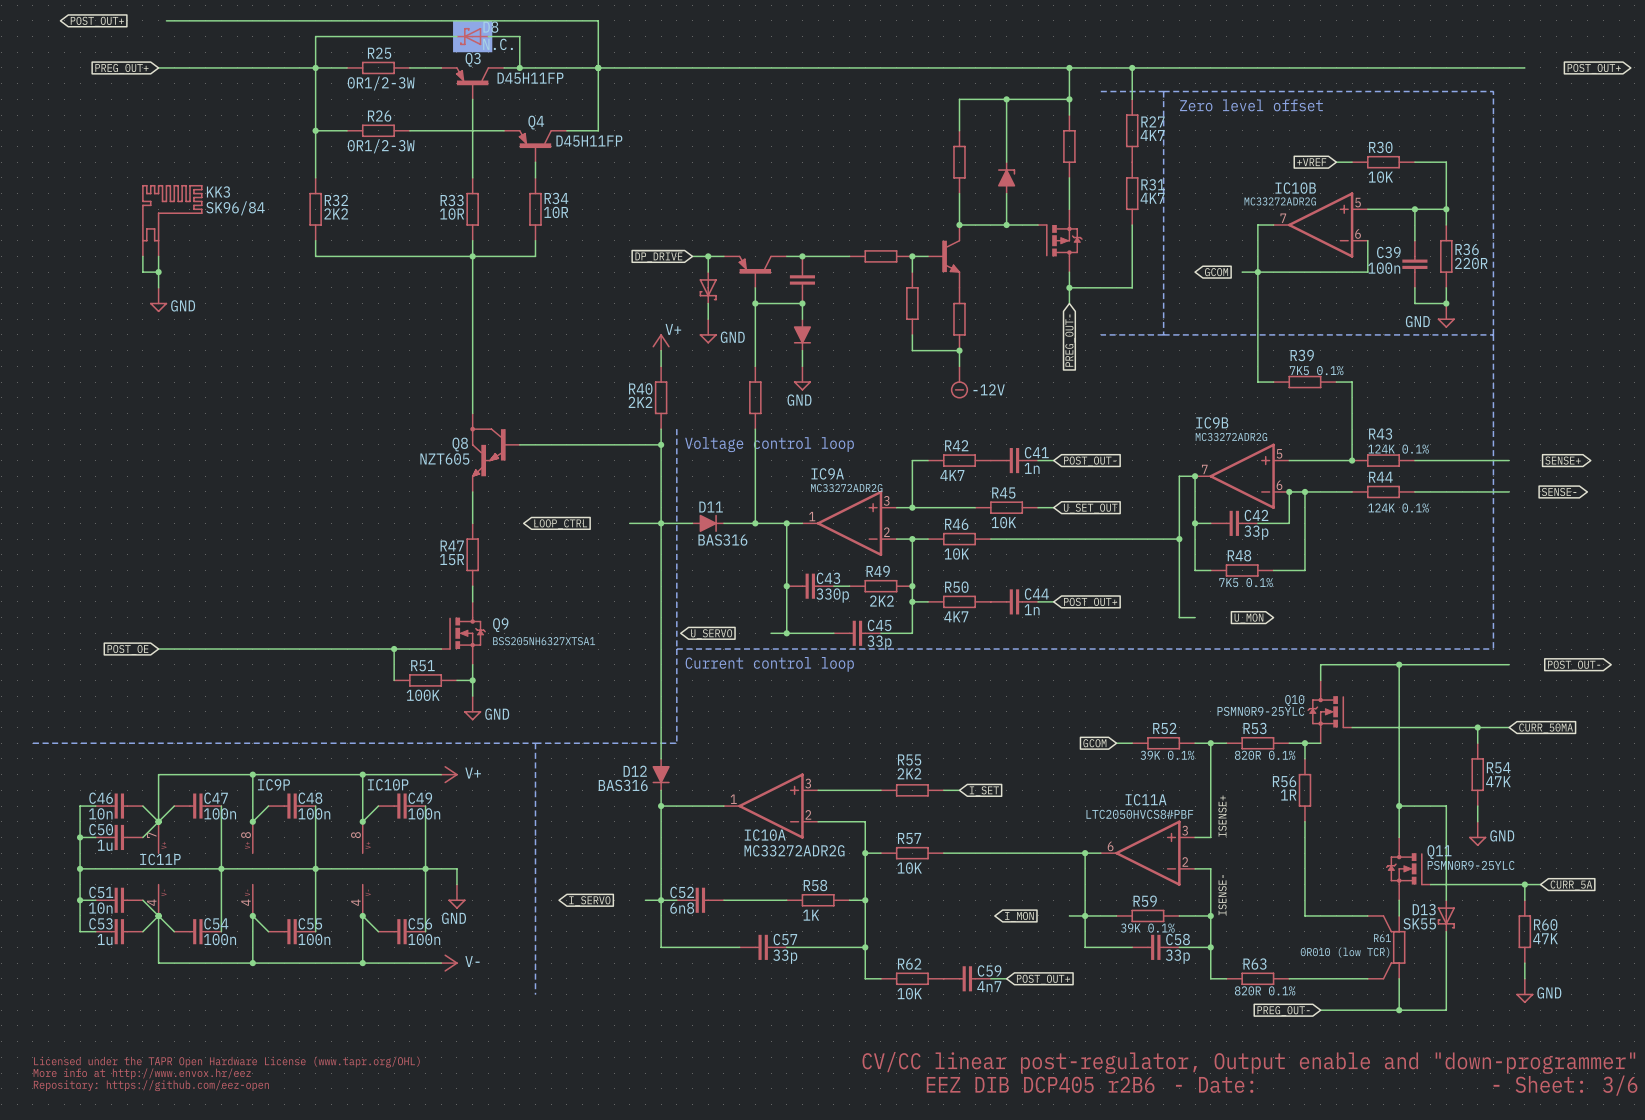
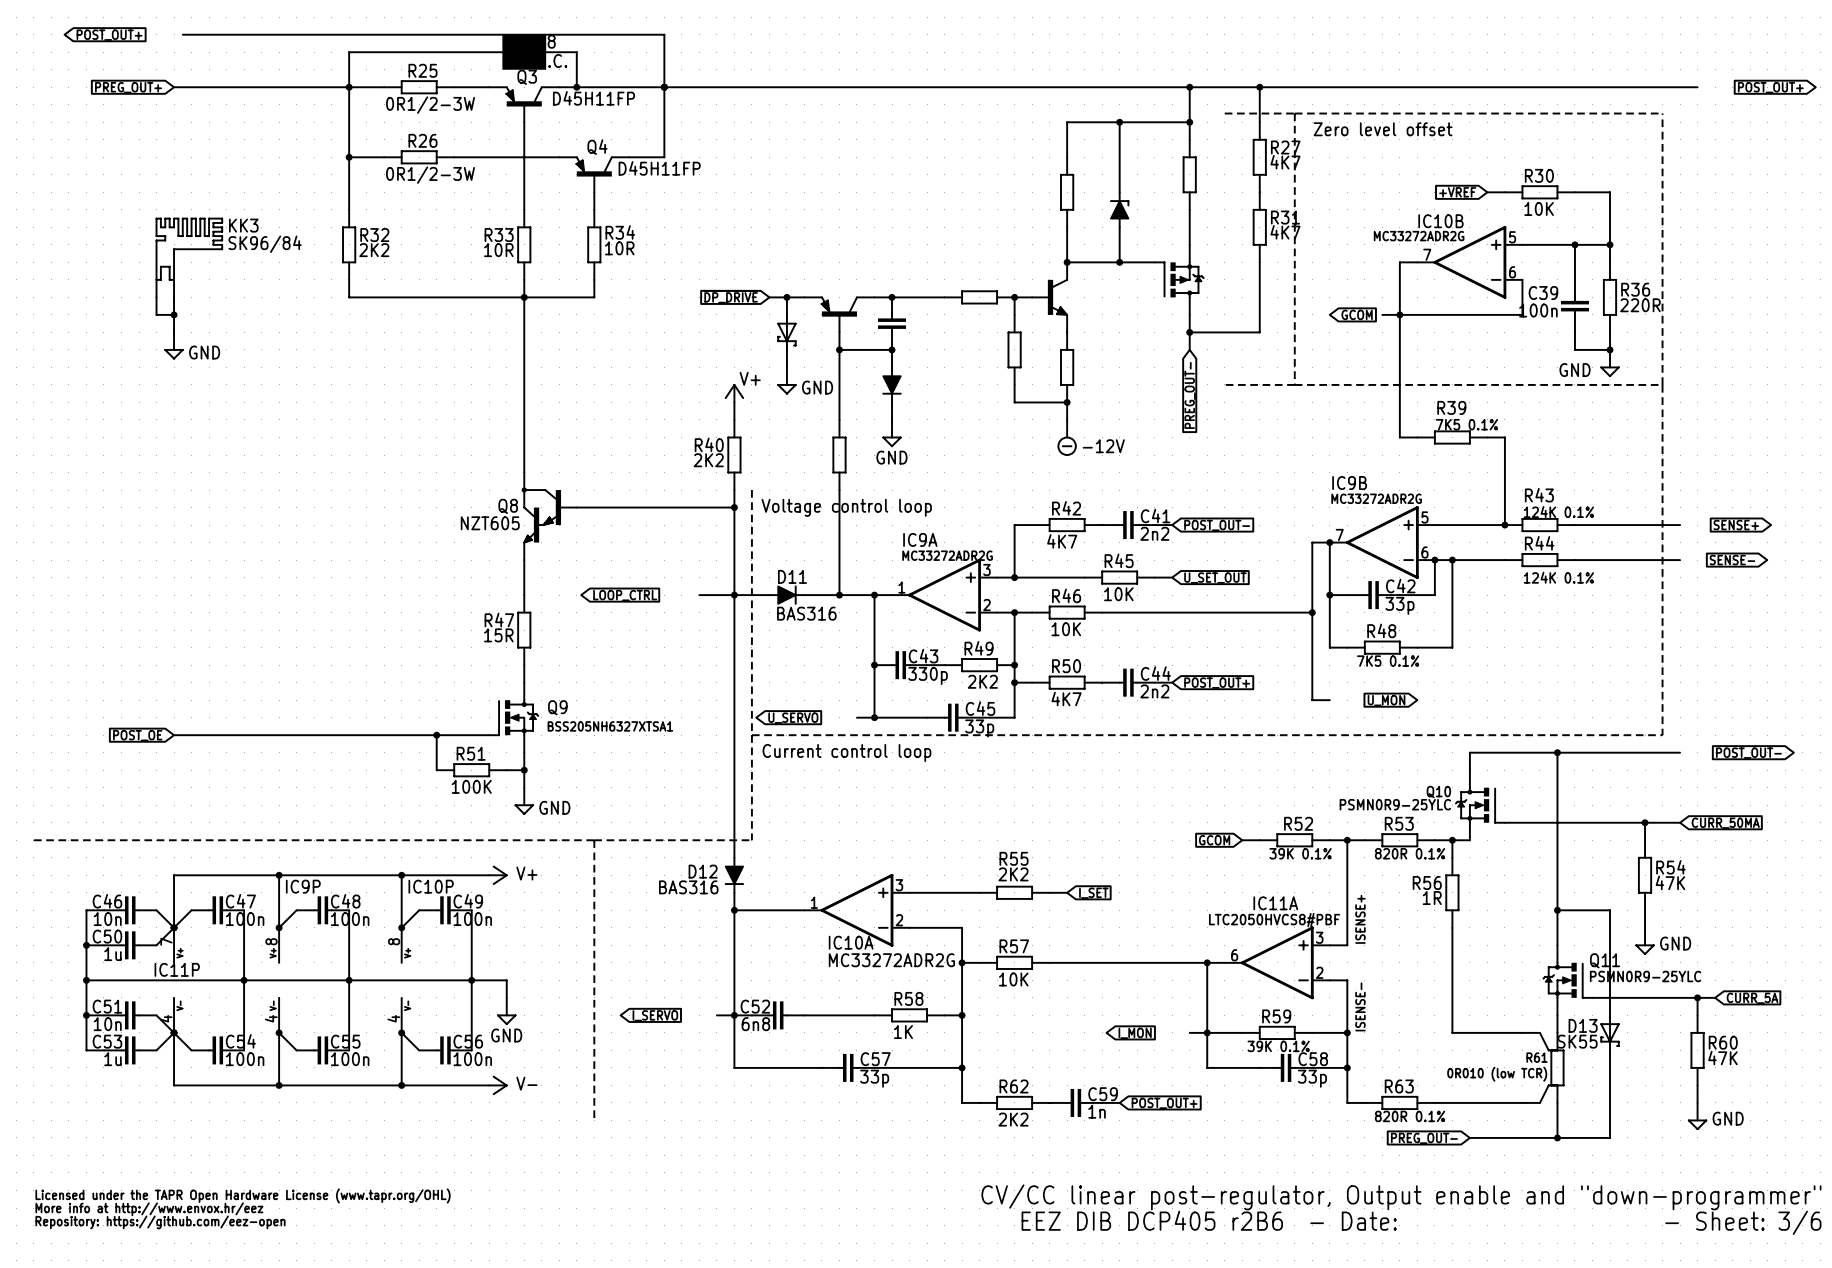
C41 value: 1n (1032, 468) -> 2n2 (1154, 533)
C44 value: 1n (1032, 609) -> 2n2 (1154, 691)
C59 value: 4n7 (989, 986) -> 1n (1097, 1111)
R62 value: 10K (909, 993) -> 2K2 (1013, 1119)

